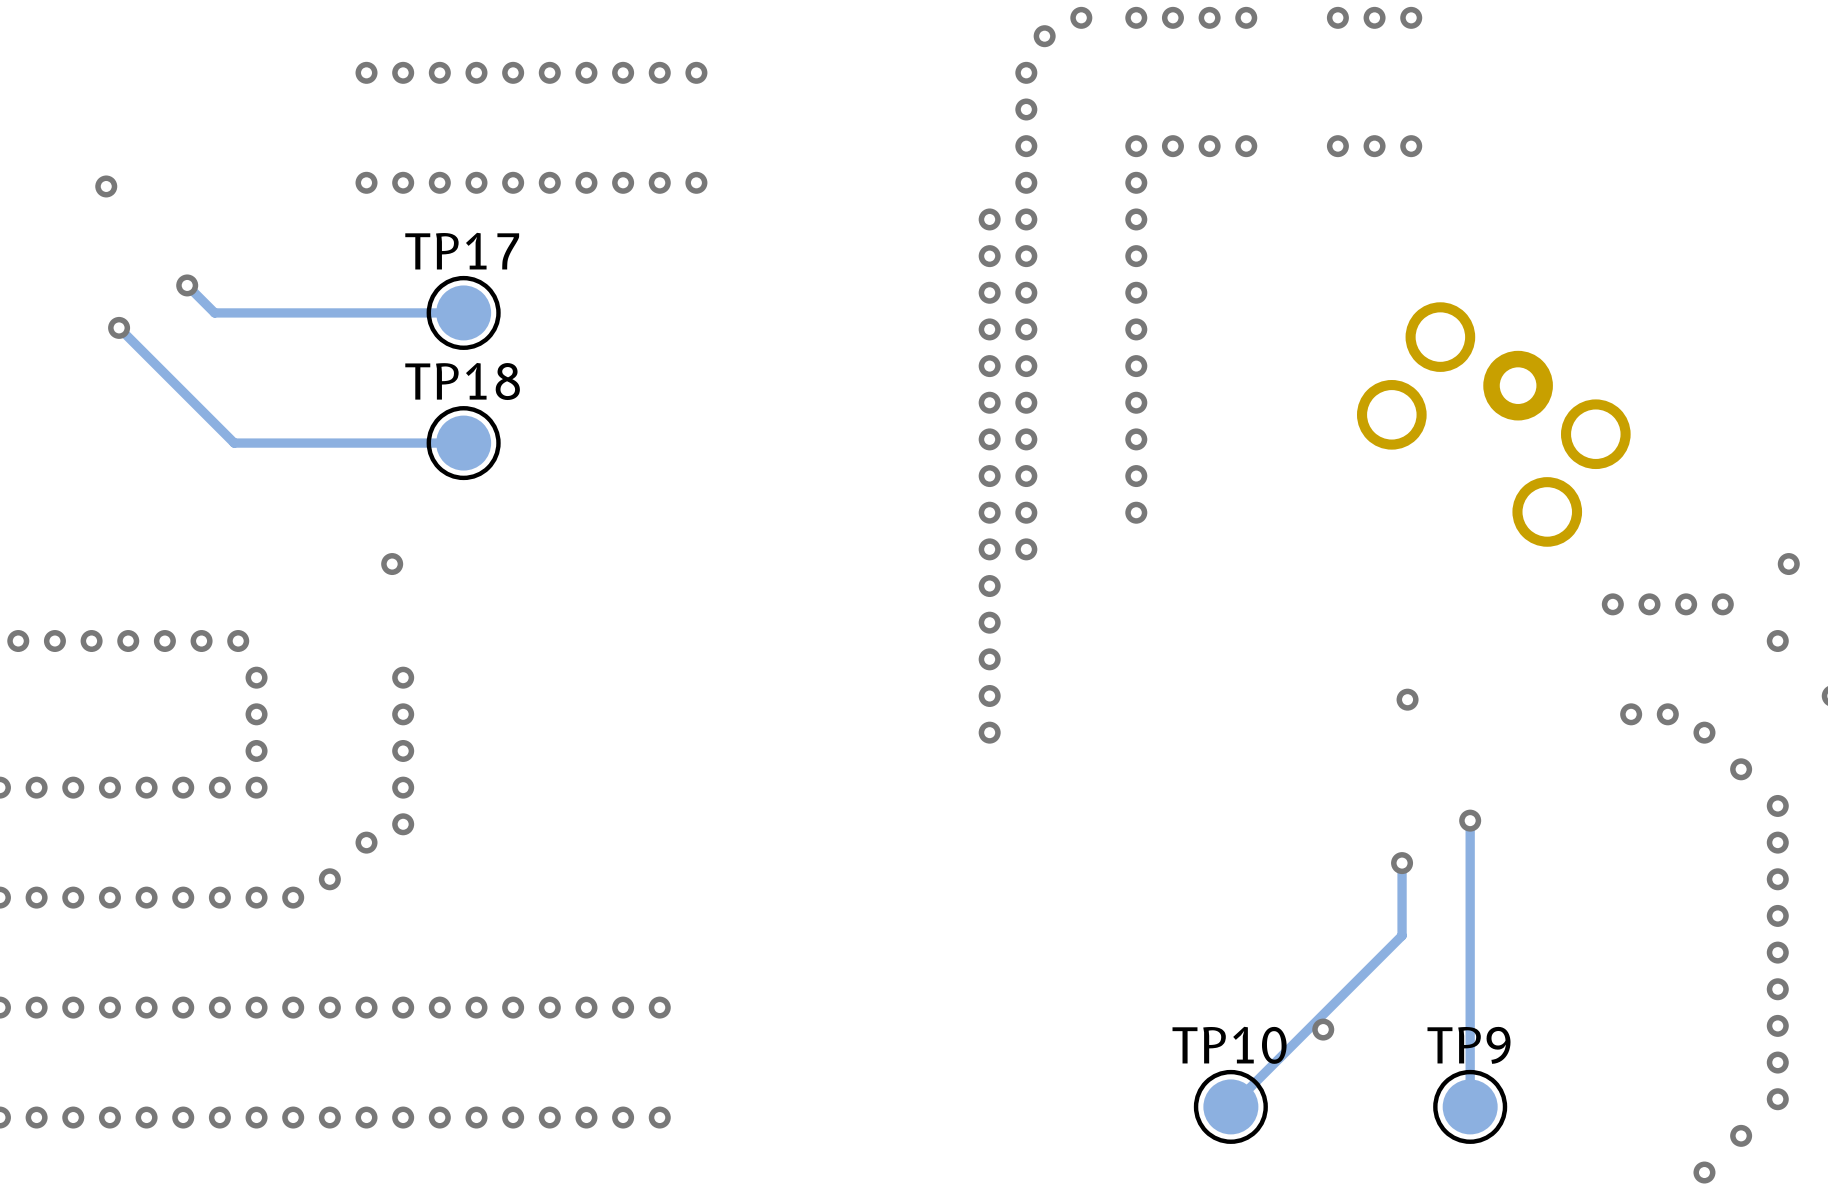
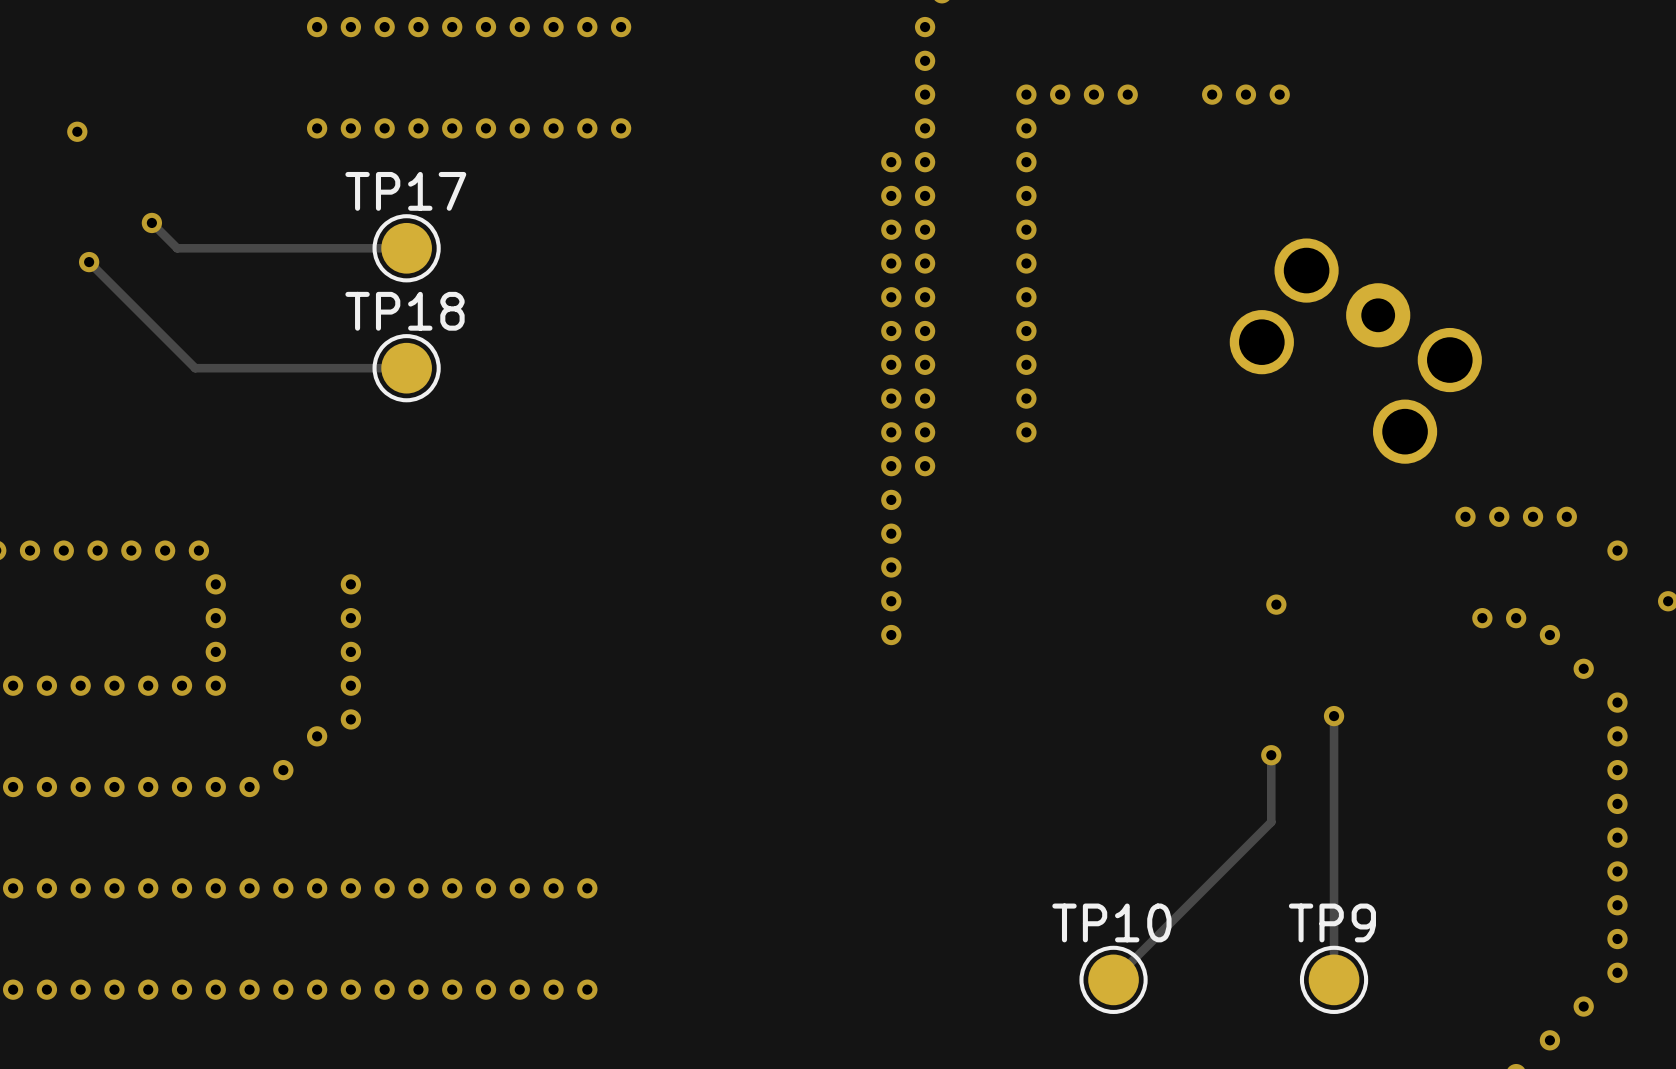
via: (392, 564) -> none
via: (1788, 564) -> none
via: (1323, 1029) -> none

